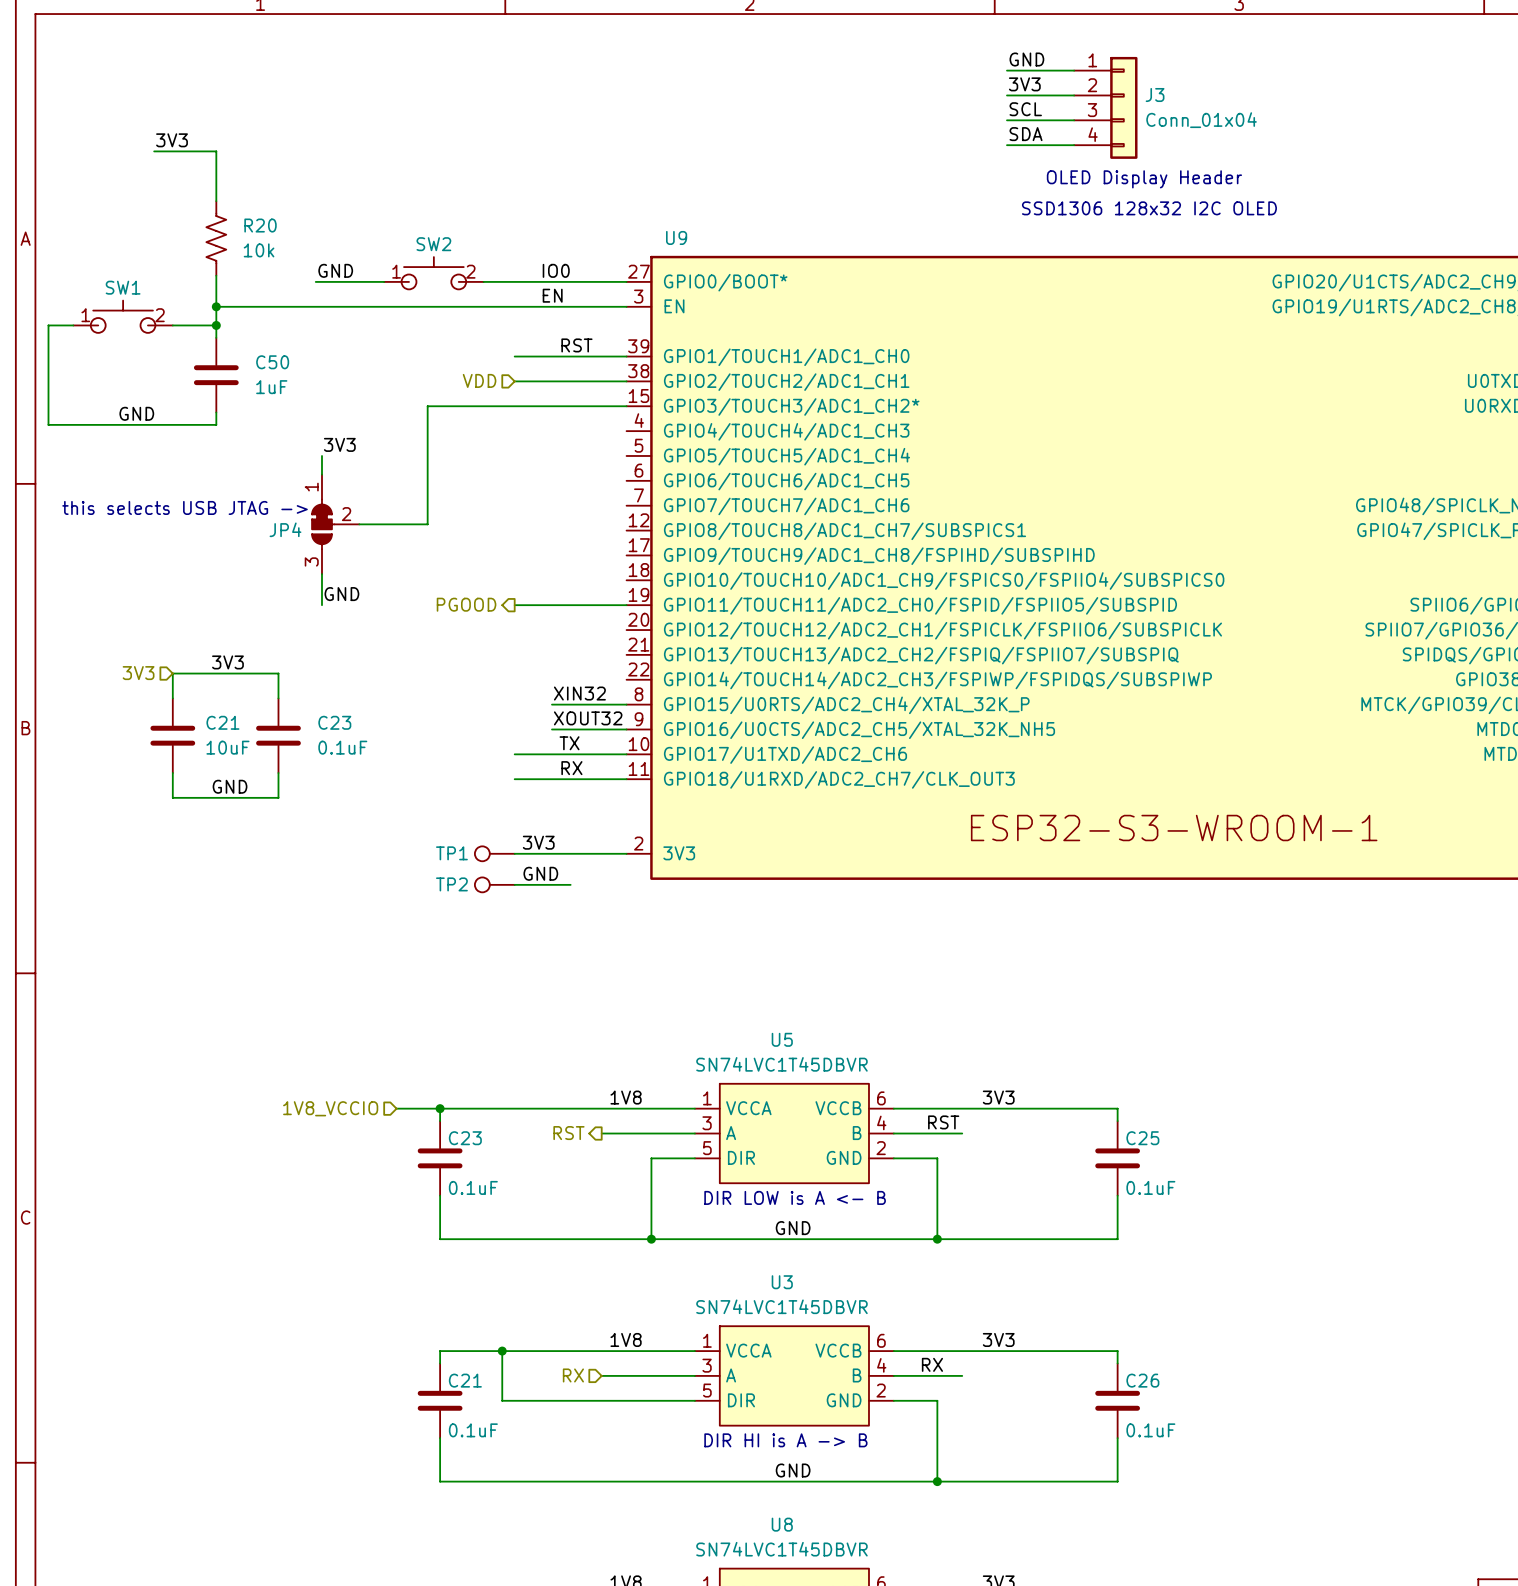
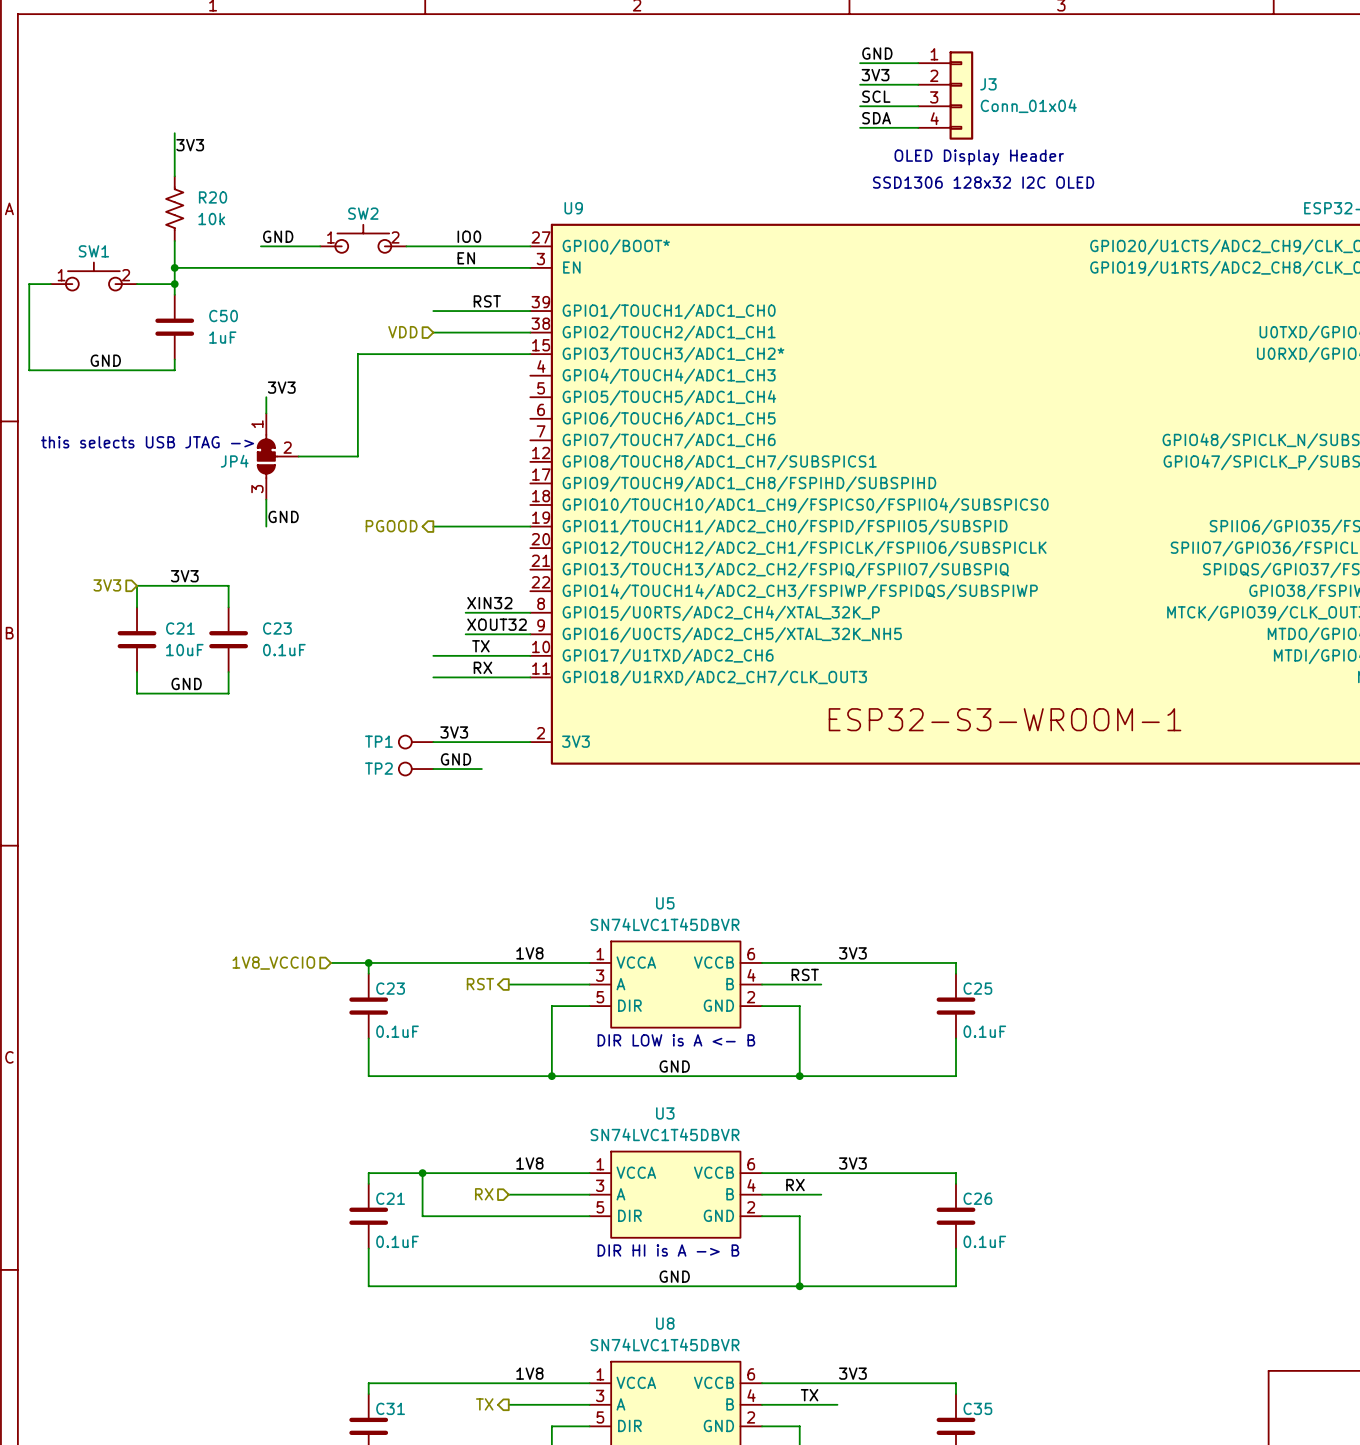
label position: 3V3 (172, 140) -> 3V3 (190, 145)
wire: (154, 151) (216, 151) -> none

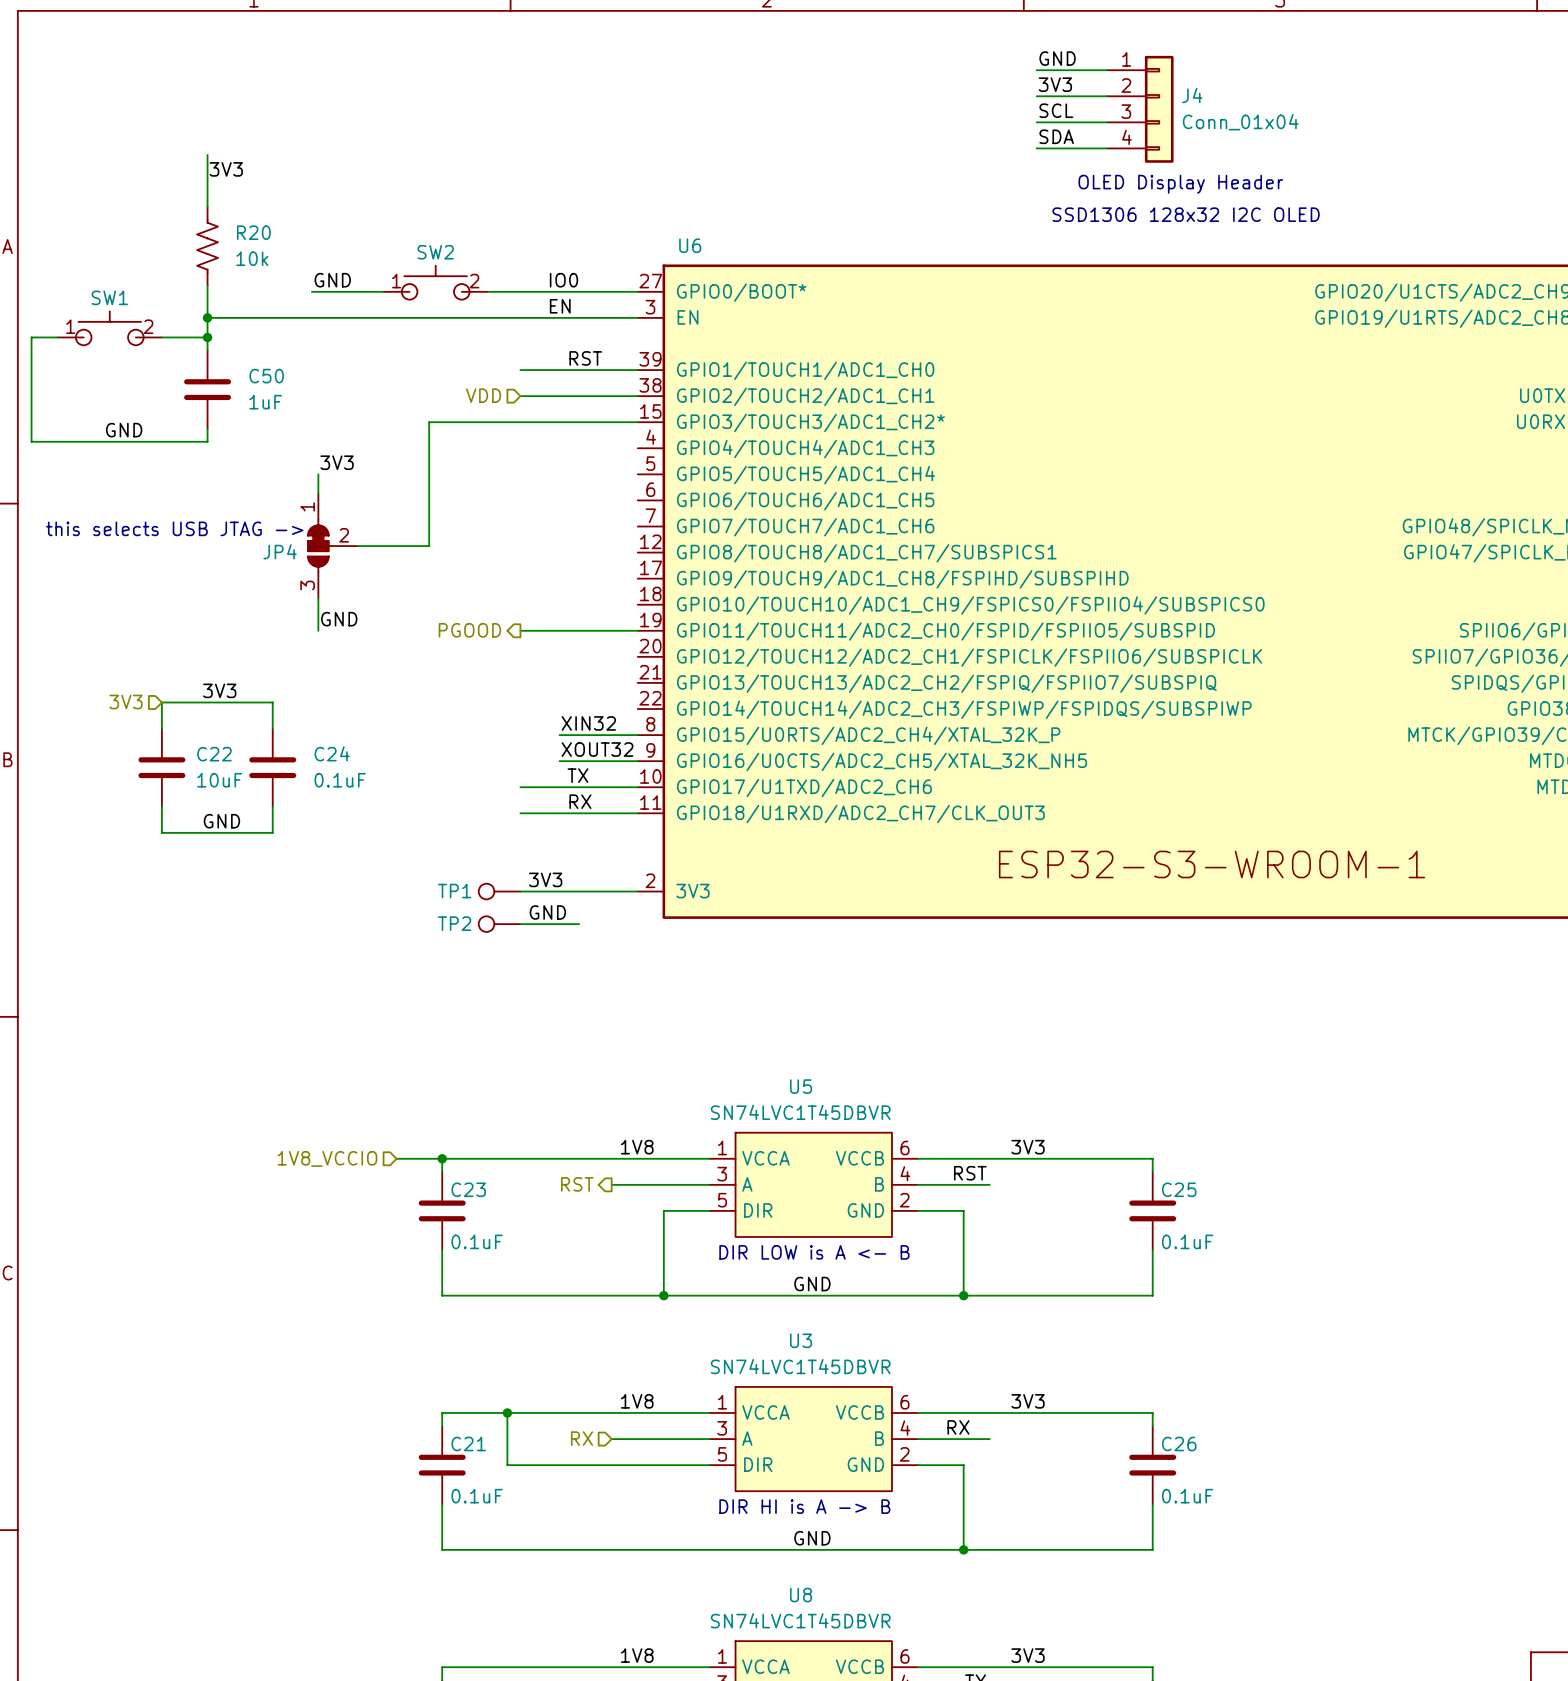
J3 name: J3 (988, 84) -> J4 (1192, 95)
U9 name: U9 (573, 208) -> U6 (690, 245)
C21 name: C21 (180, 628) -> C22 (214, 754)
C23 name: C23 (277, 628) -> C24 (332, 753)

